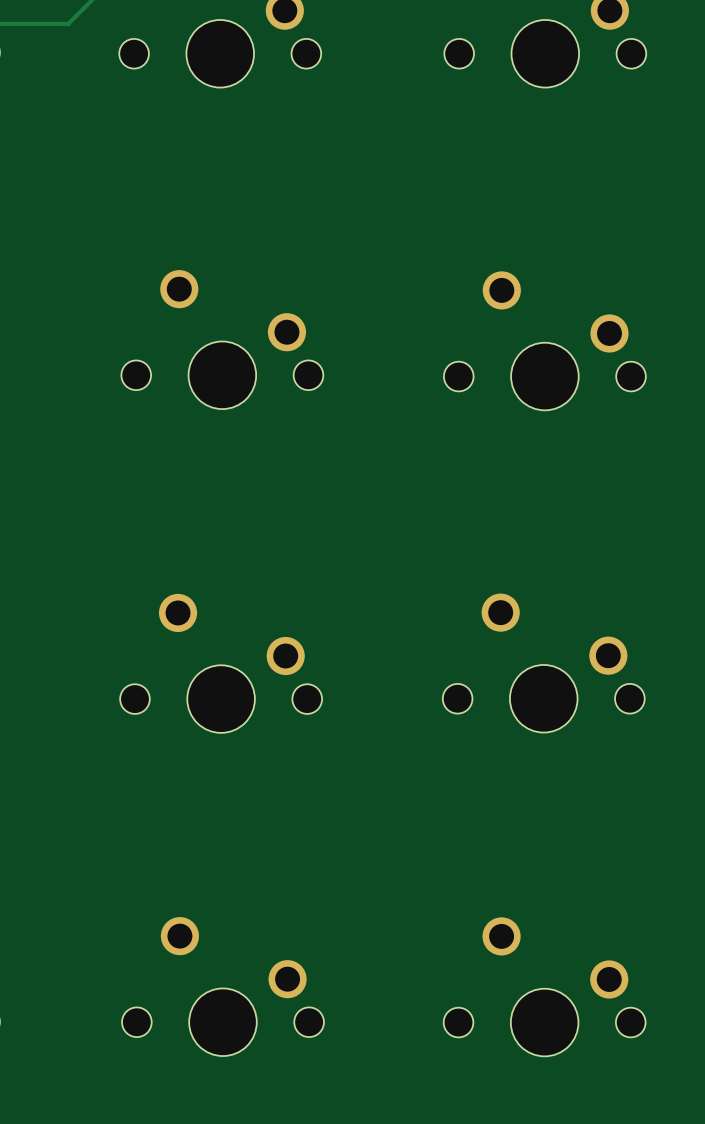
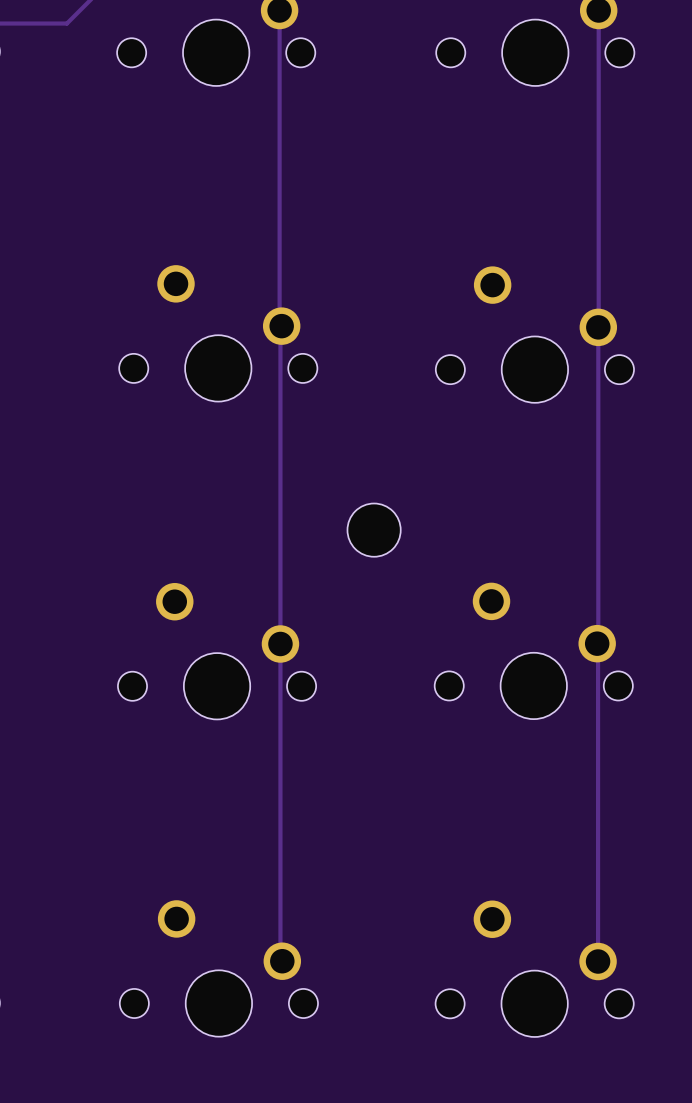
track: none -> (279, 10) (279, 324) (281, 326) (280, 959) (282, 961)
track: none -> (598, 10) (598, 961)
part: none -> (374, 530)

